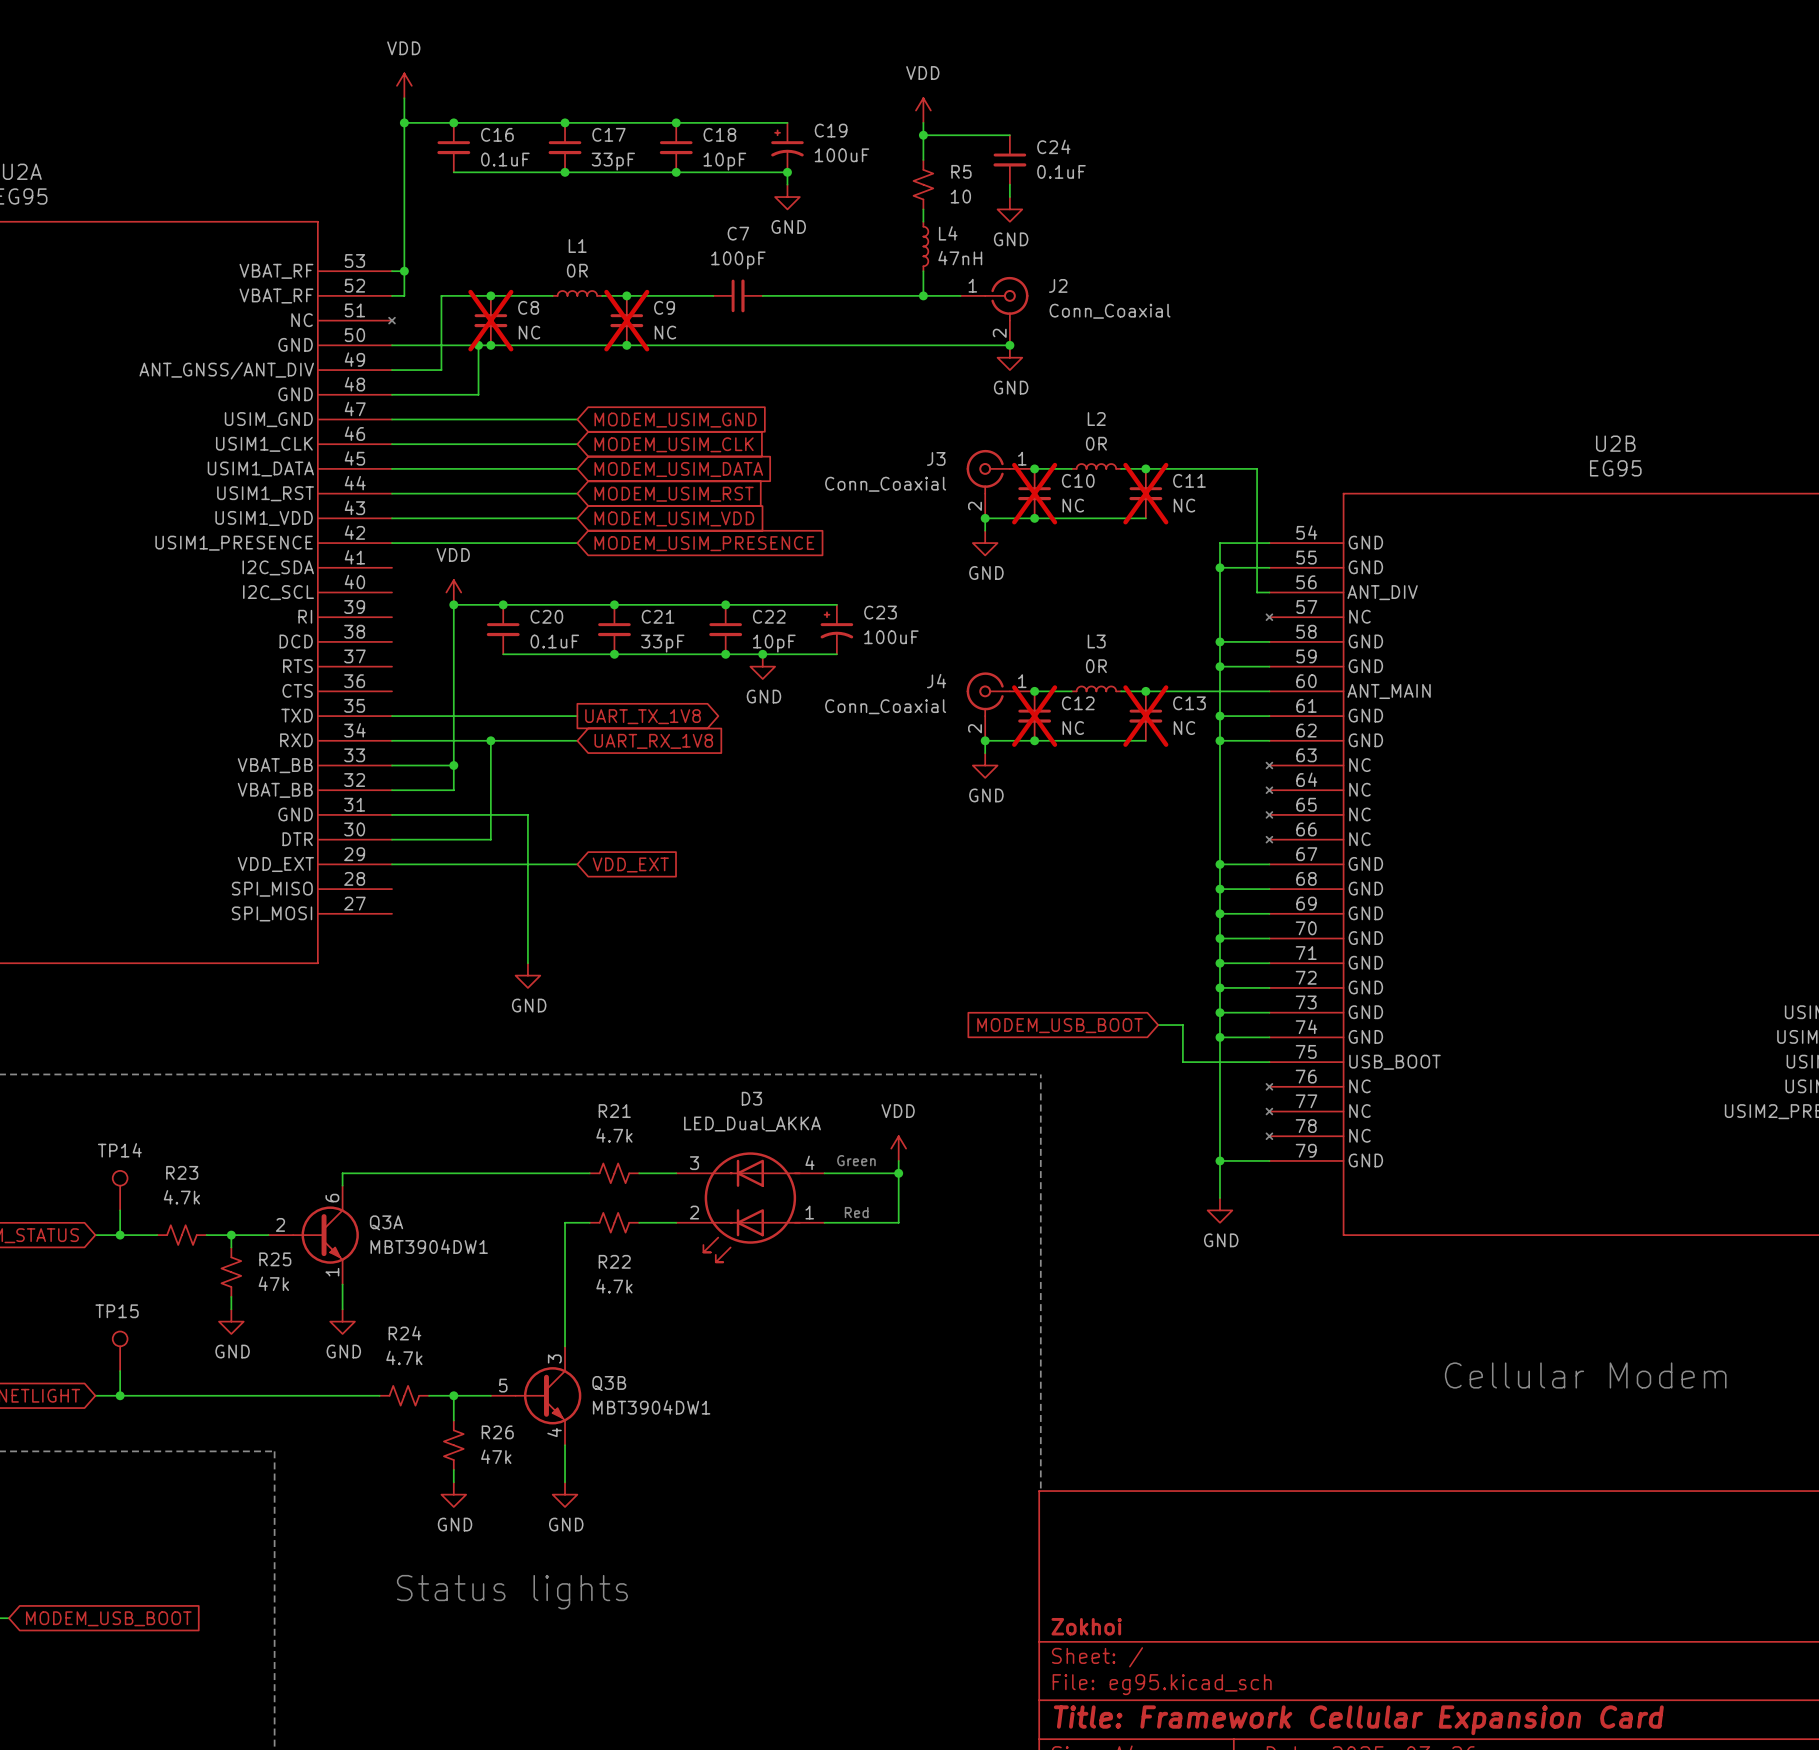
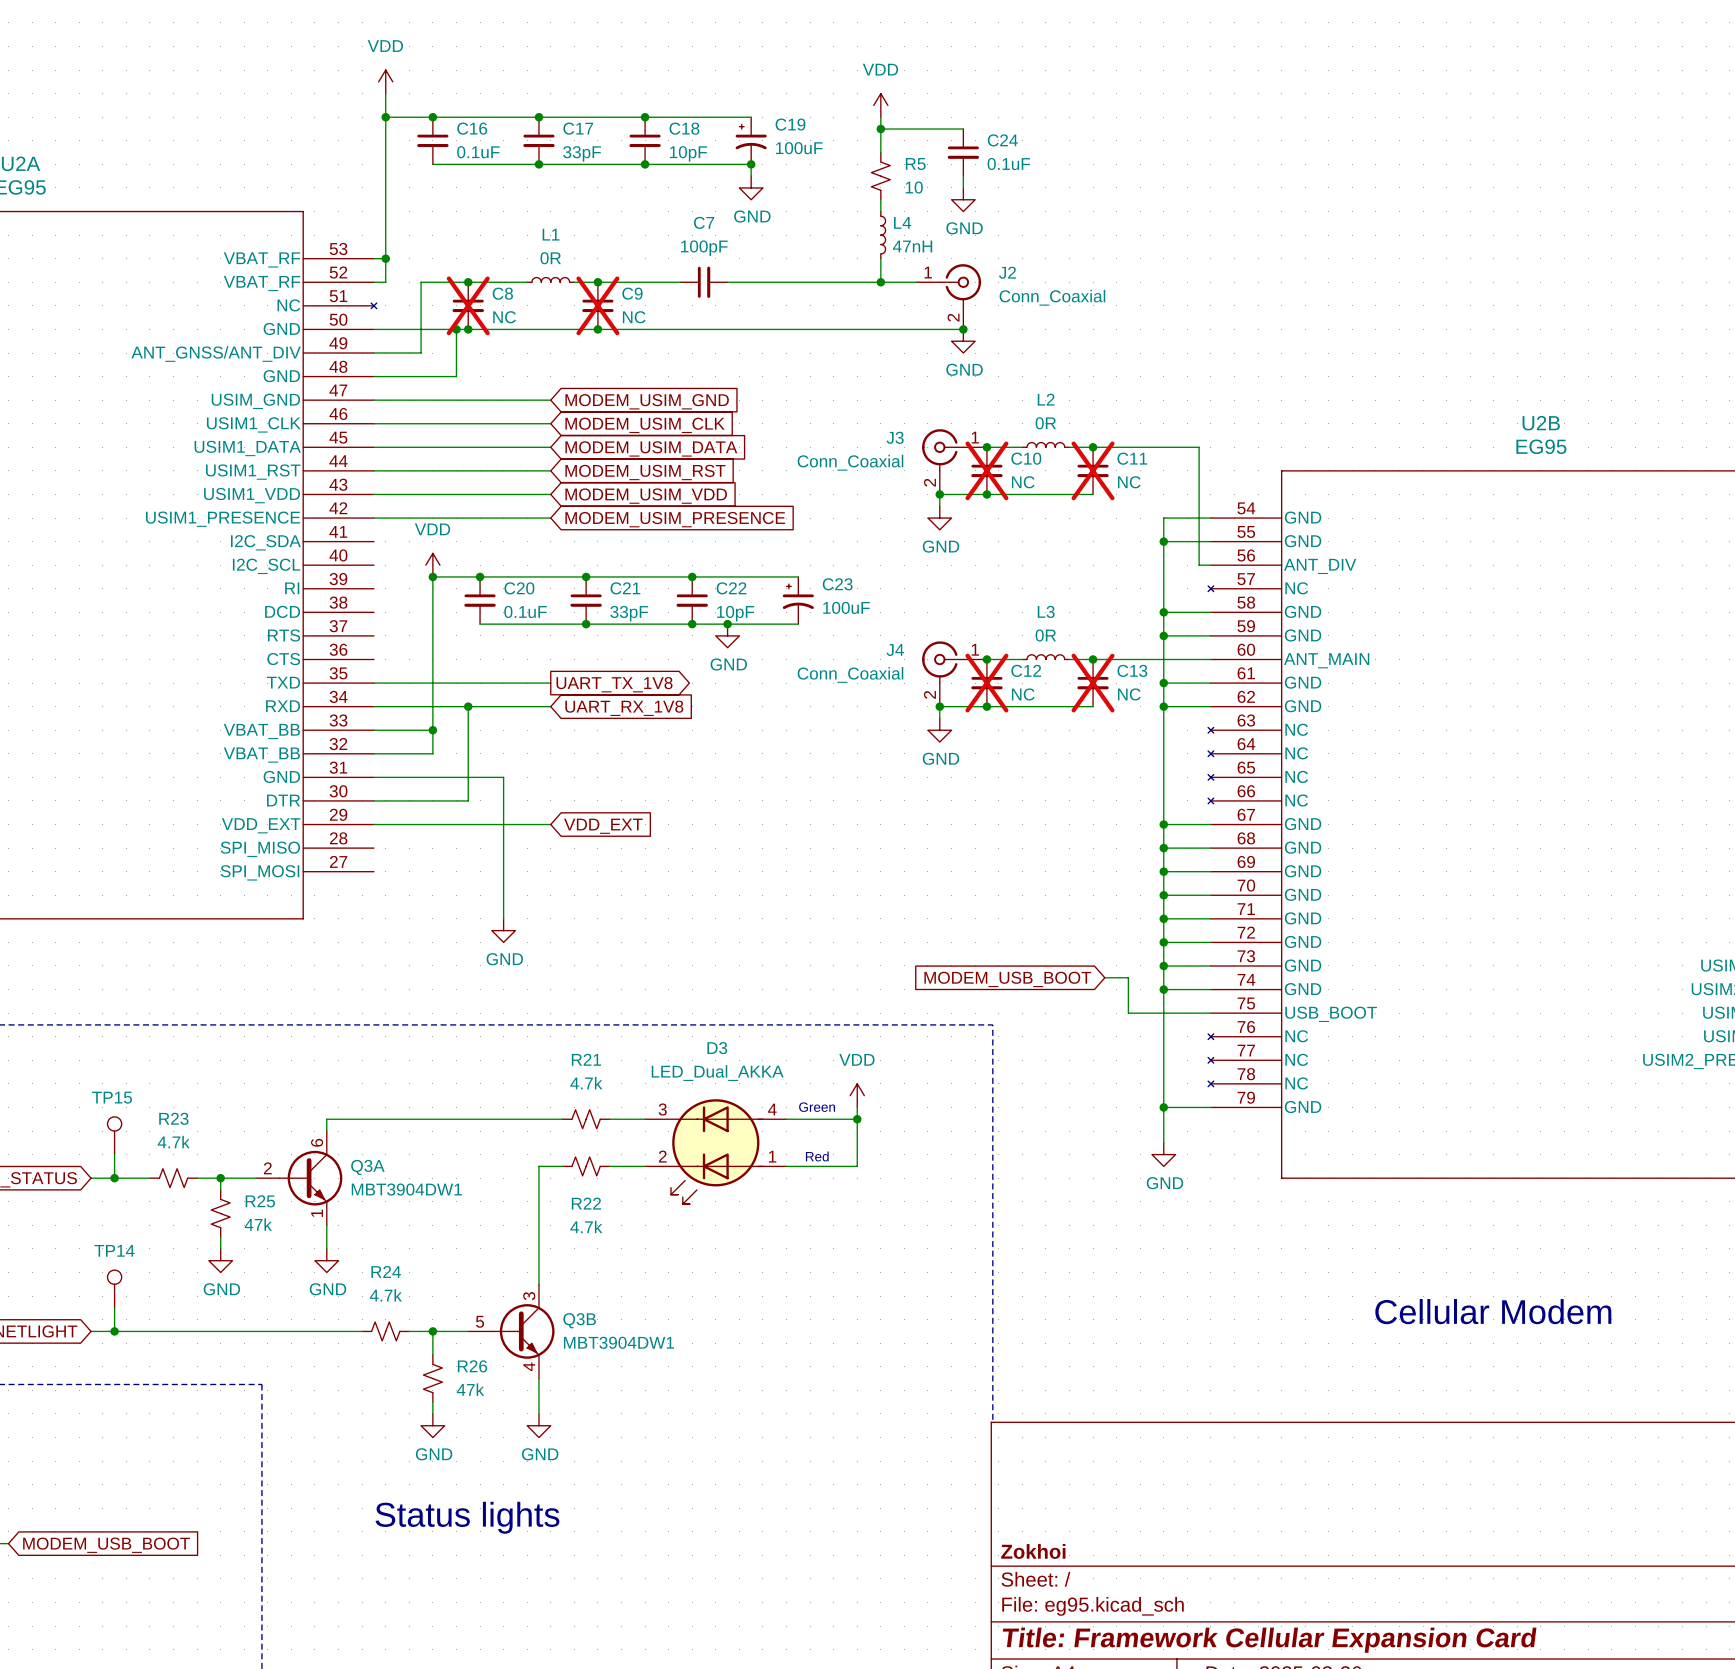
TP14 name: TP14 (119, 1150) -> TP15 (112, 1097)
TP15 name: TP15 (117, 1311) -> TP14 (114, 1250)

